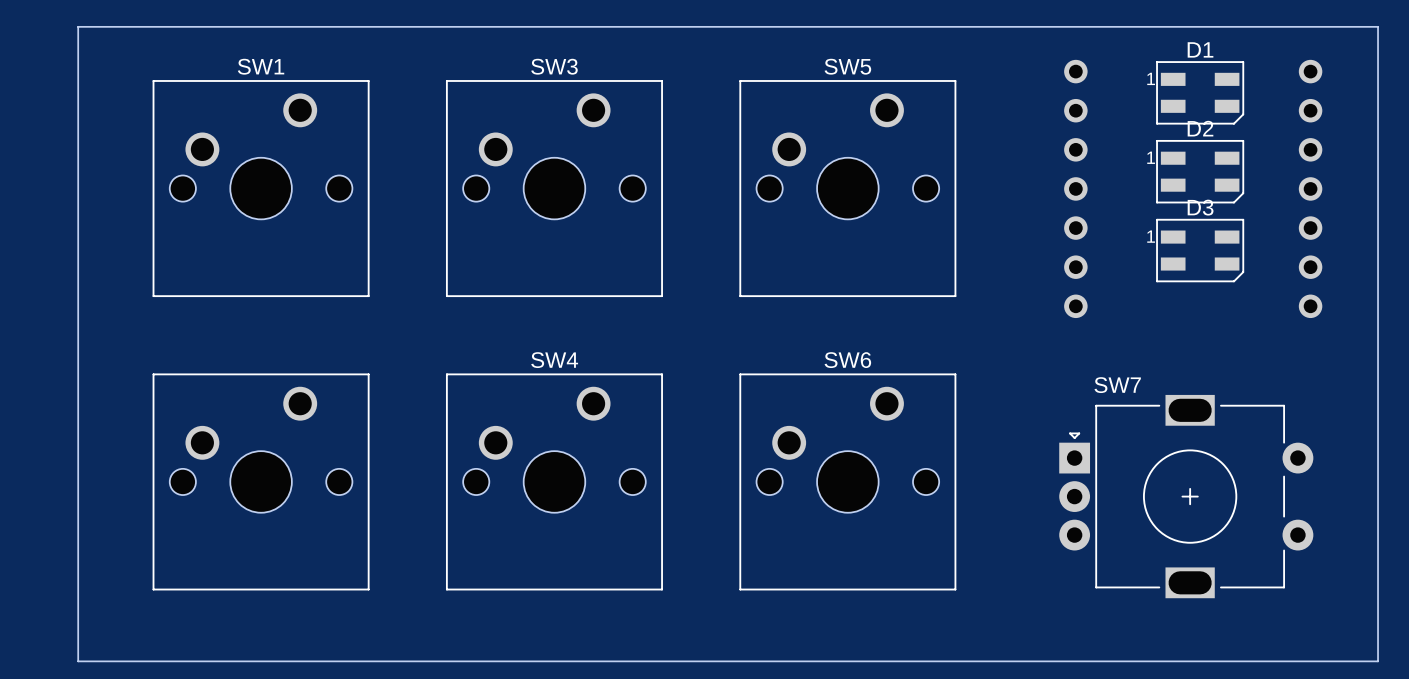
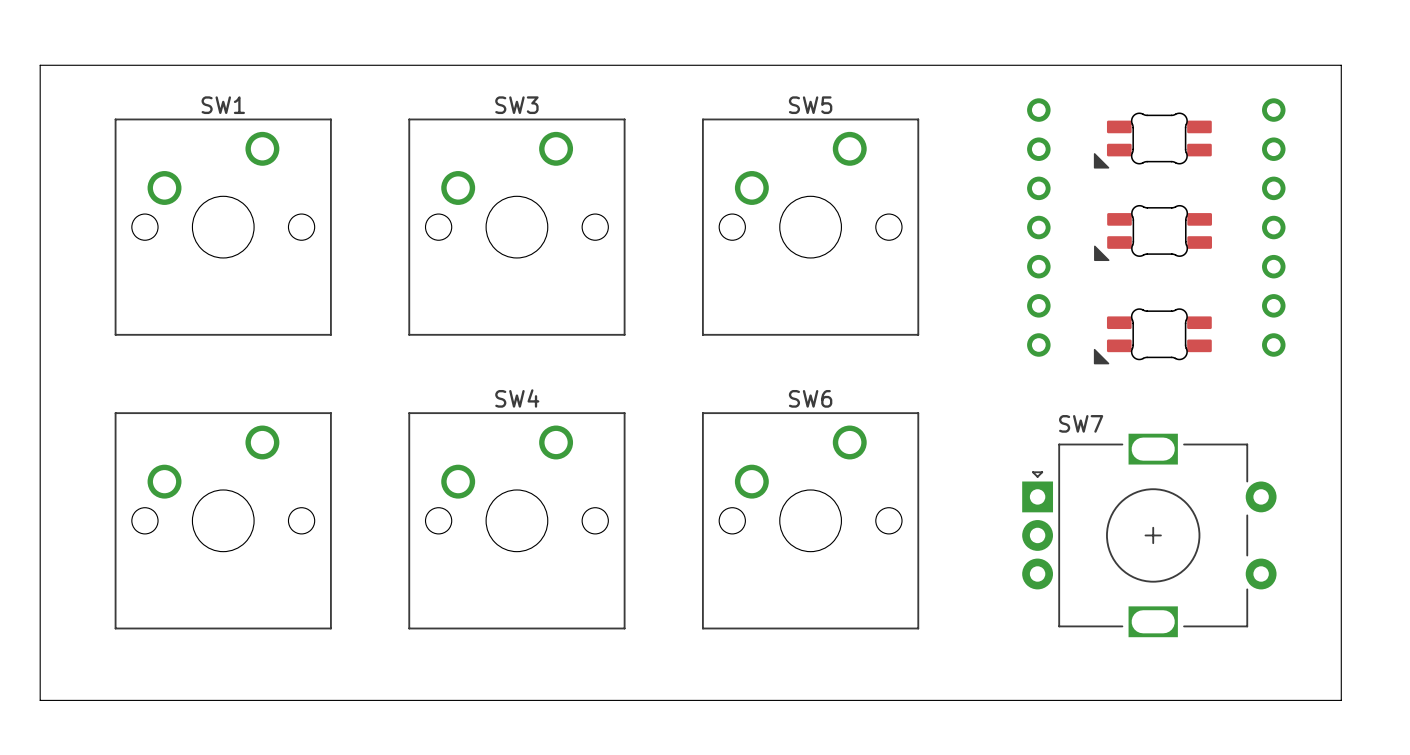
D1: (1200, 92) -> none
part: none -> (1152, 140)
D2: (1200, 171) -> none
part: none -> (1153, 232)
D3: (1200, 250) -> none
part: none -> (1152, 336)

